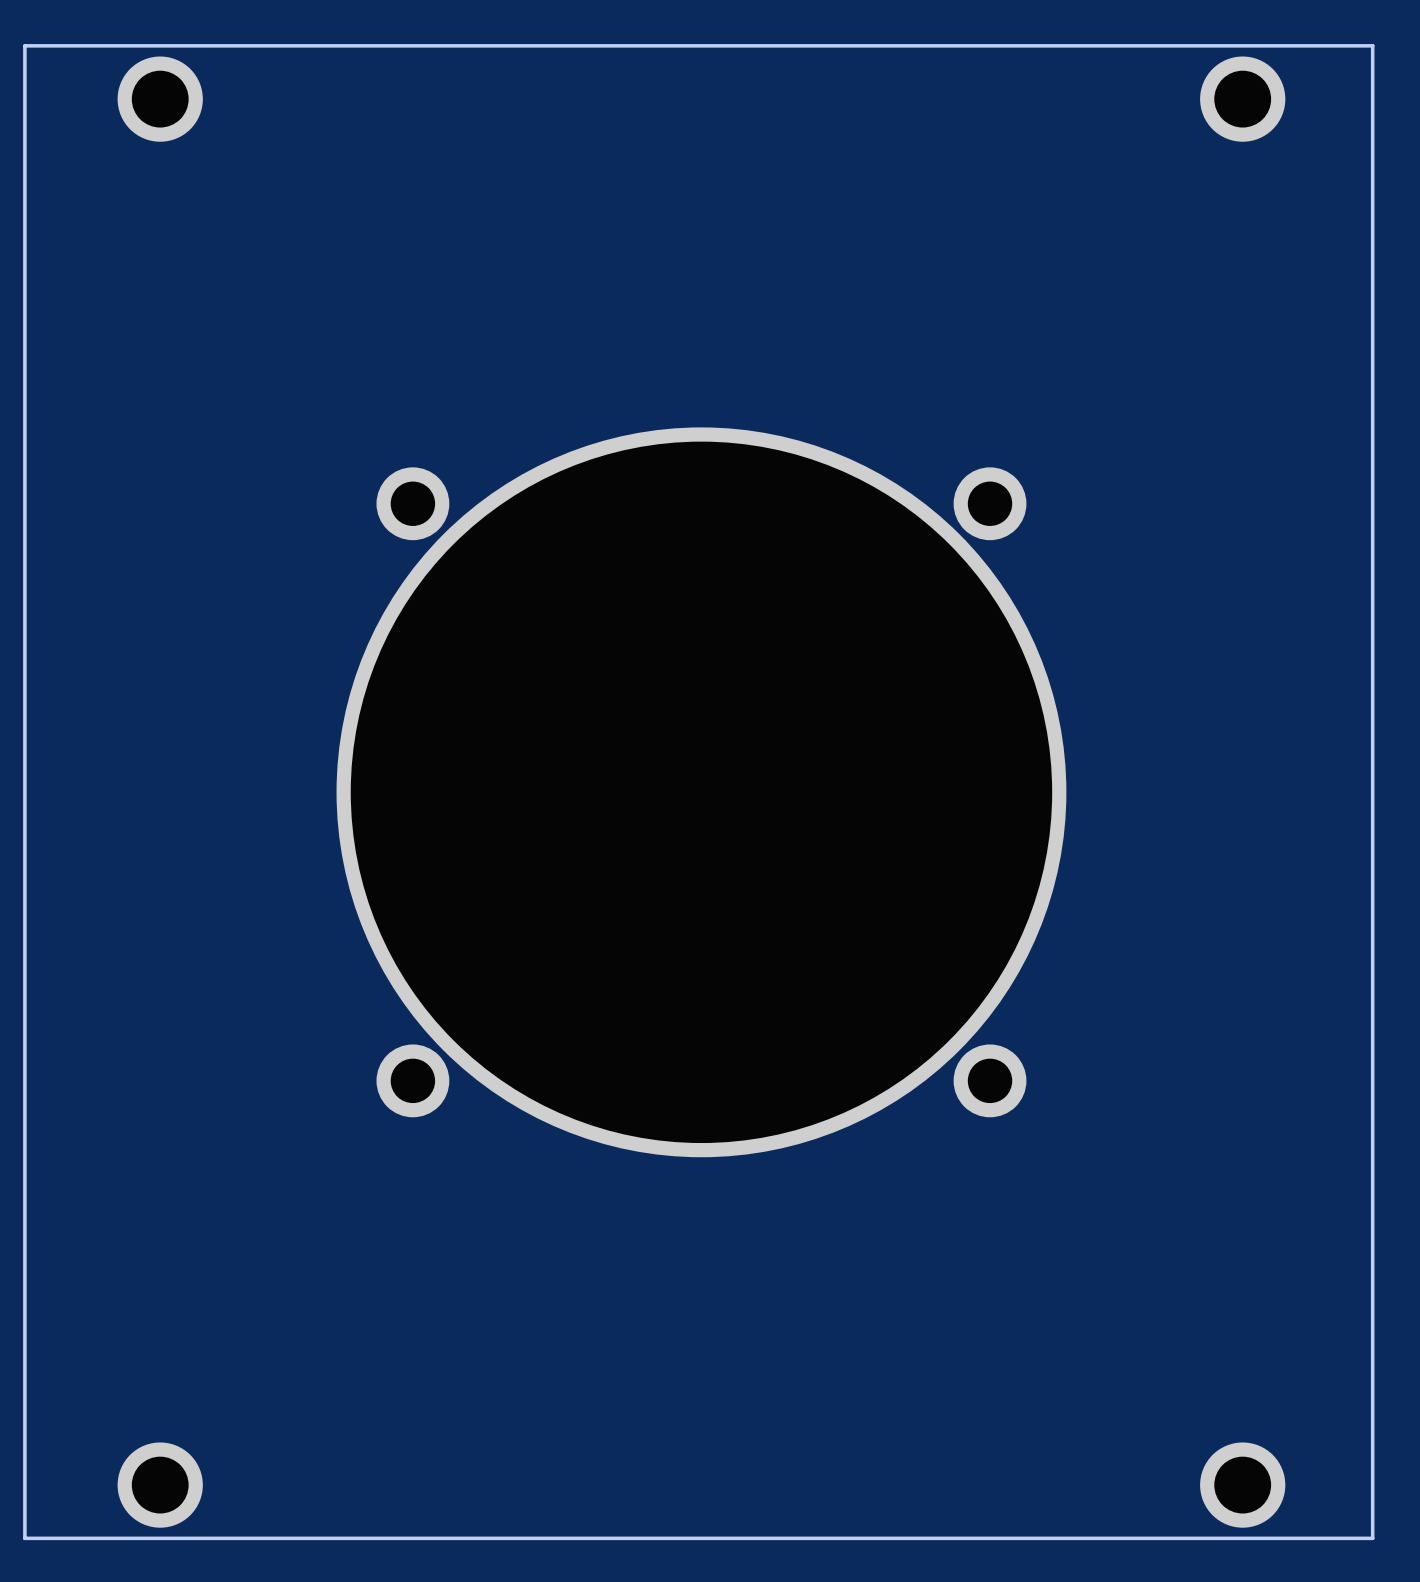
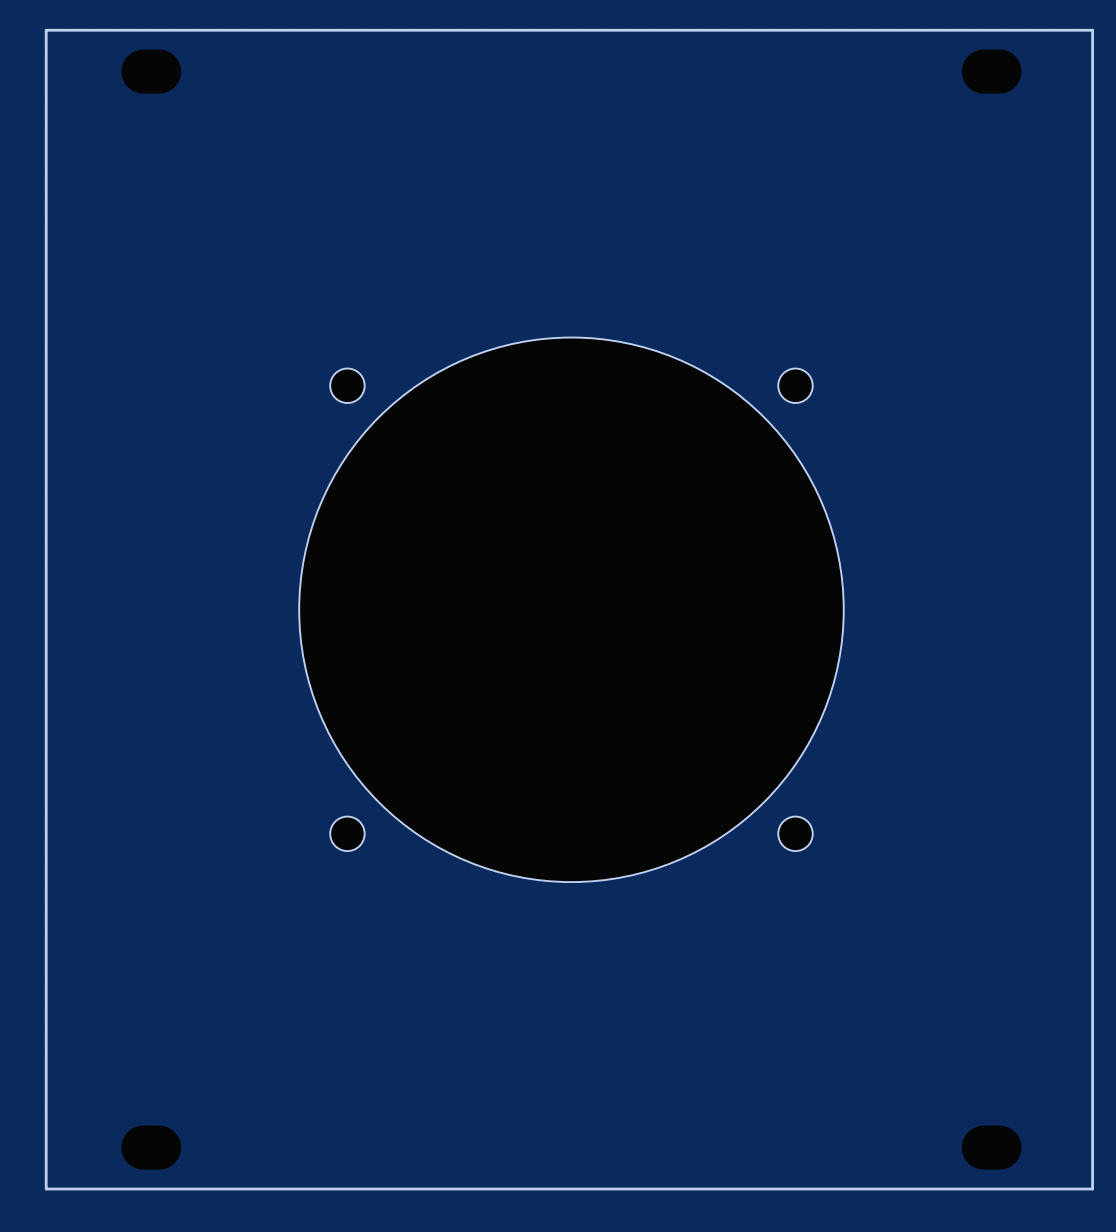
part footprint: [117, 56, 203, 142] -> [121, 49, 182, 94]
part footprint: [1200, 56, 1286, 142] -> [961, 49, 1022, 94]
part footprint: [336, 427, 1067, 1158] -> [299, 337, 844, 883]
part footprint: [117, 1442, 203, 1528] -> [121, 1125, 182, 1170]
part footprint: [1200, 1442, 1286, 1528] -> [961, 1125, 1022, 1170]

